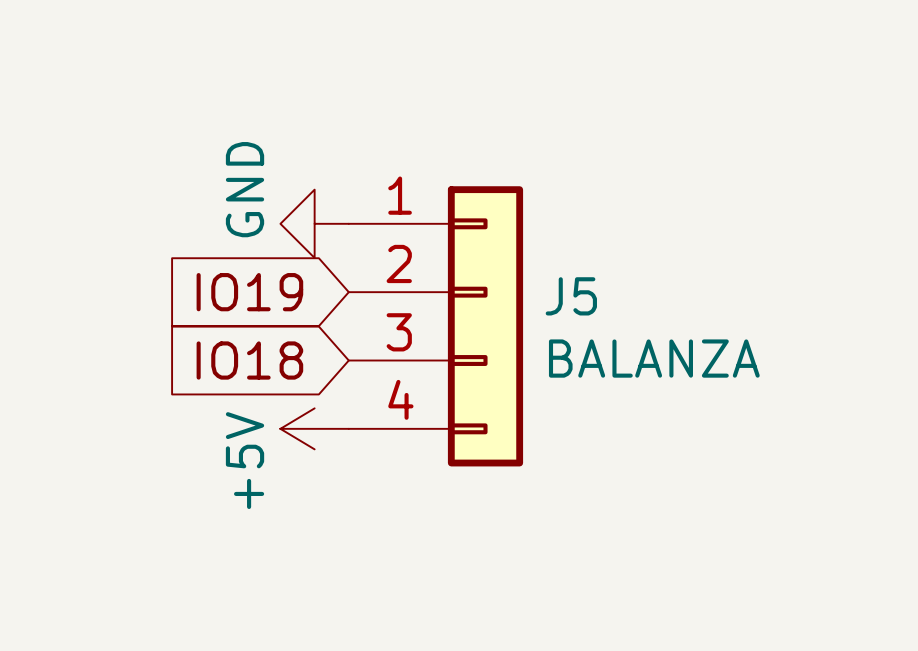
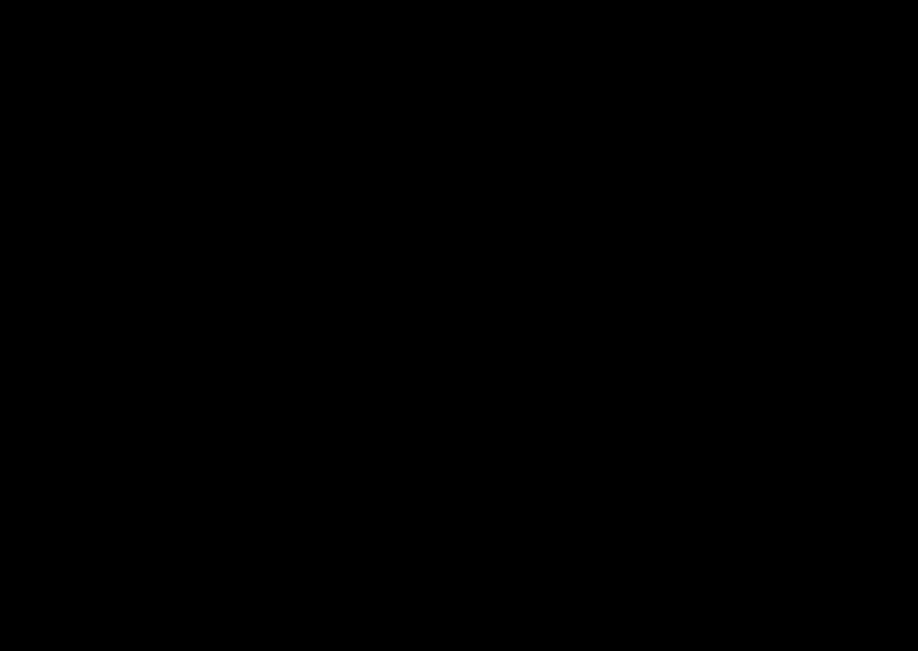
power symbol: GND (314, 223) -> none
global label: IO19 (249, 292) -> none
J5: BALANZA (435, 326) -> none
global label: IO18 (249, 360) -> none
power symbol: +5V (314, 428) -> none

